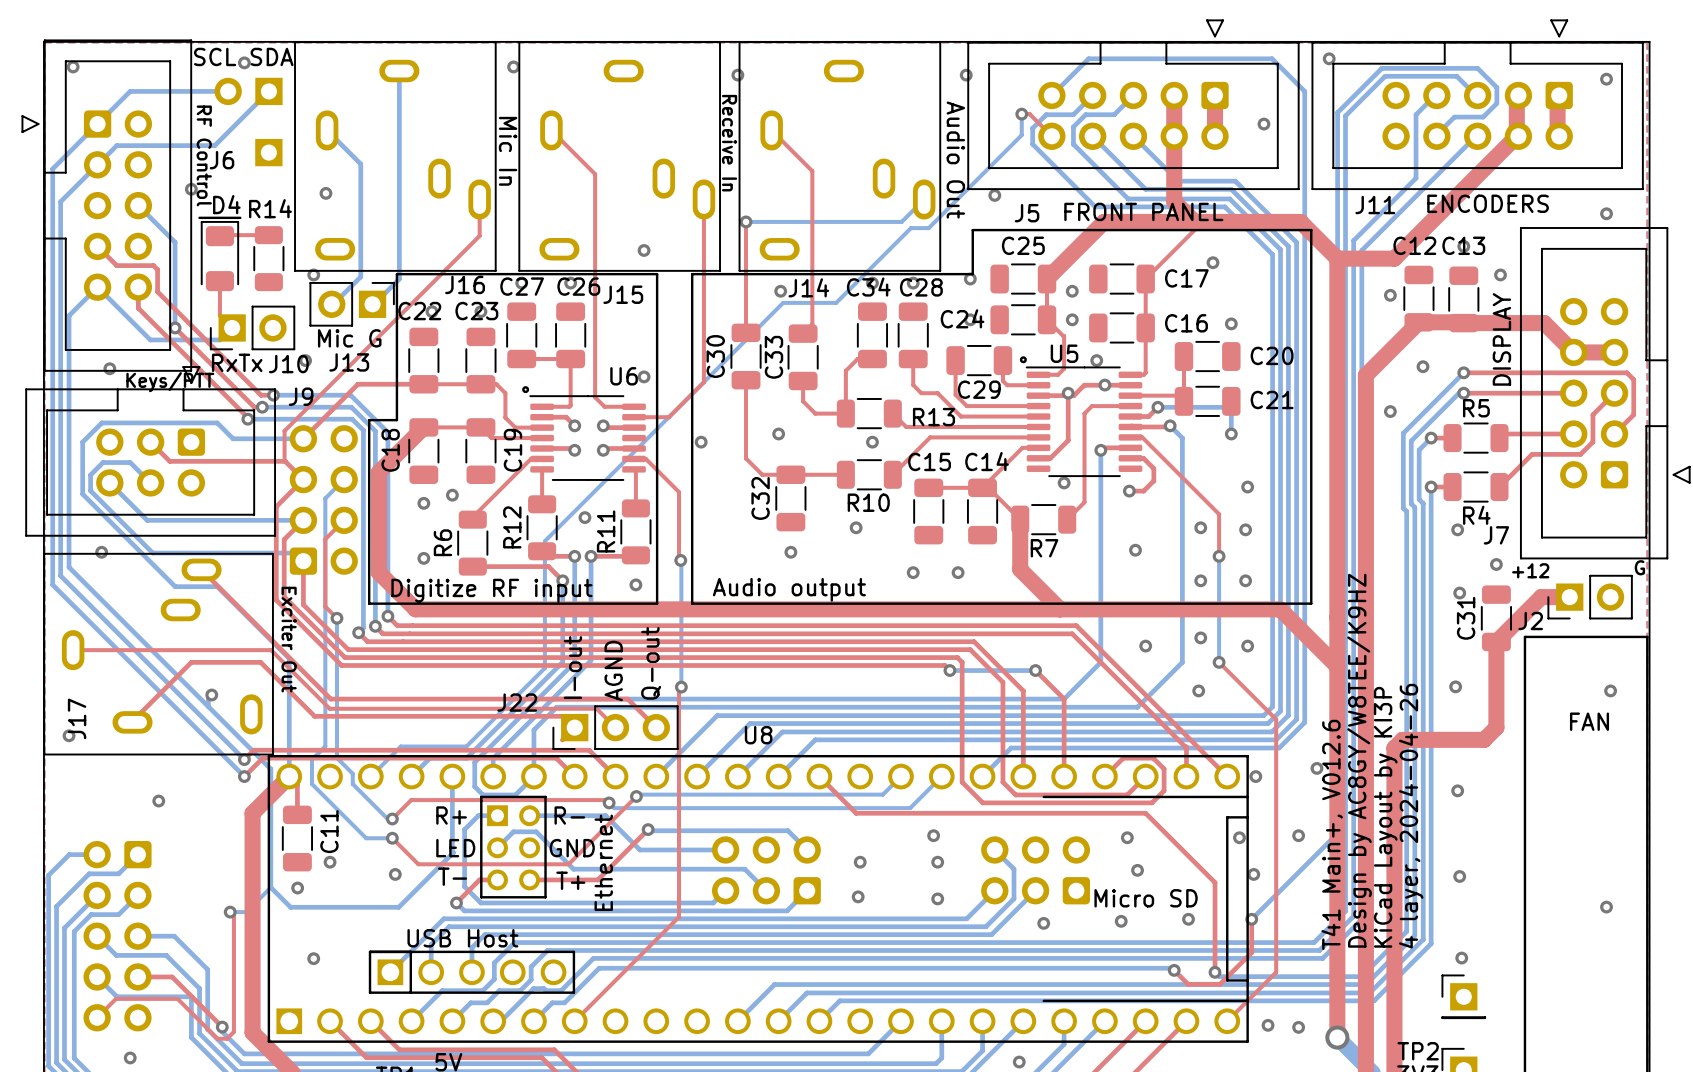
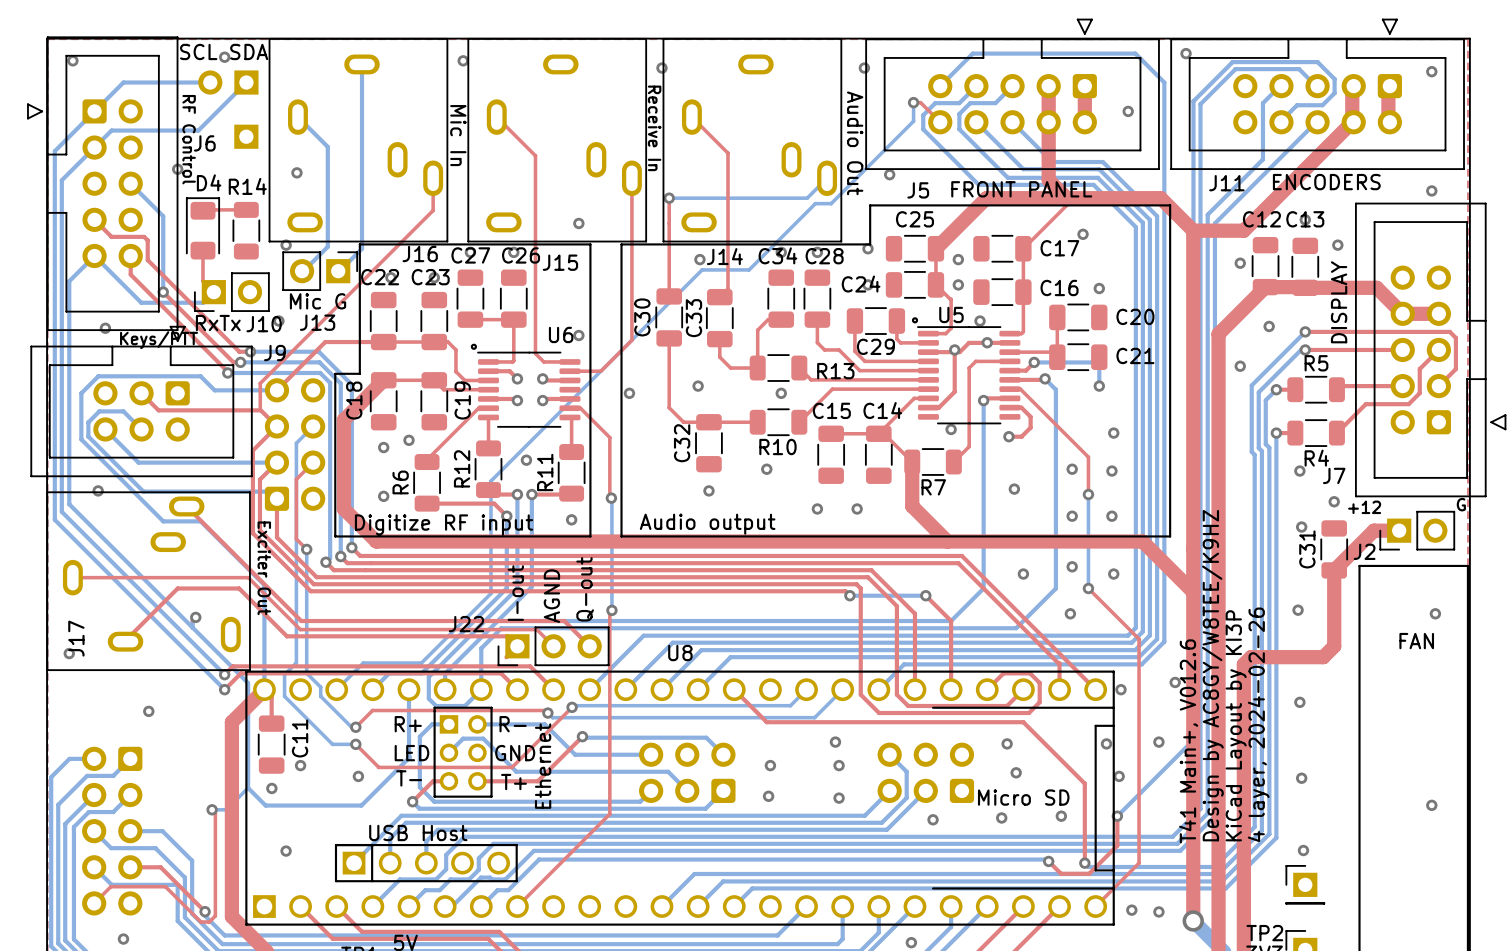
line: (199, 217) (240, 217) -> none
text: 4 layer, 2024-04-26 (1411, 816) -> 4 layer, 2024-02-26 (1258, 724)

